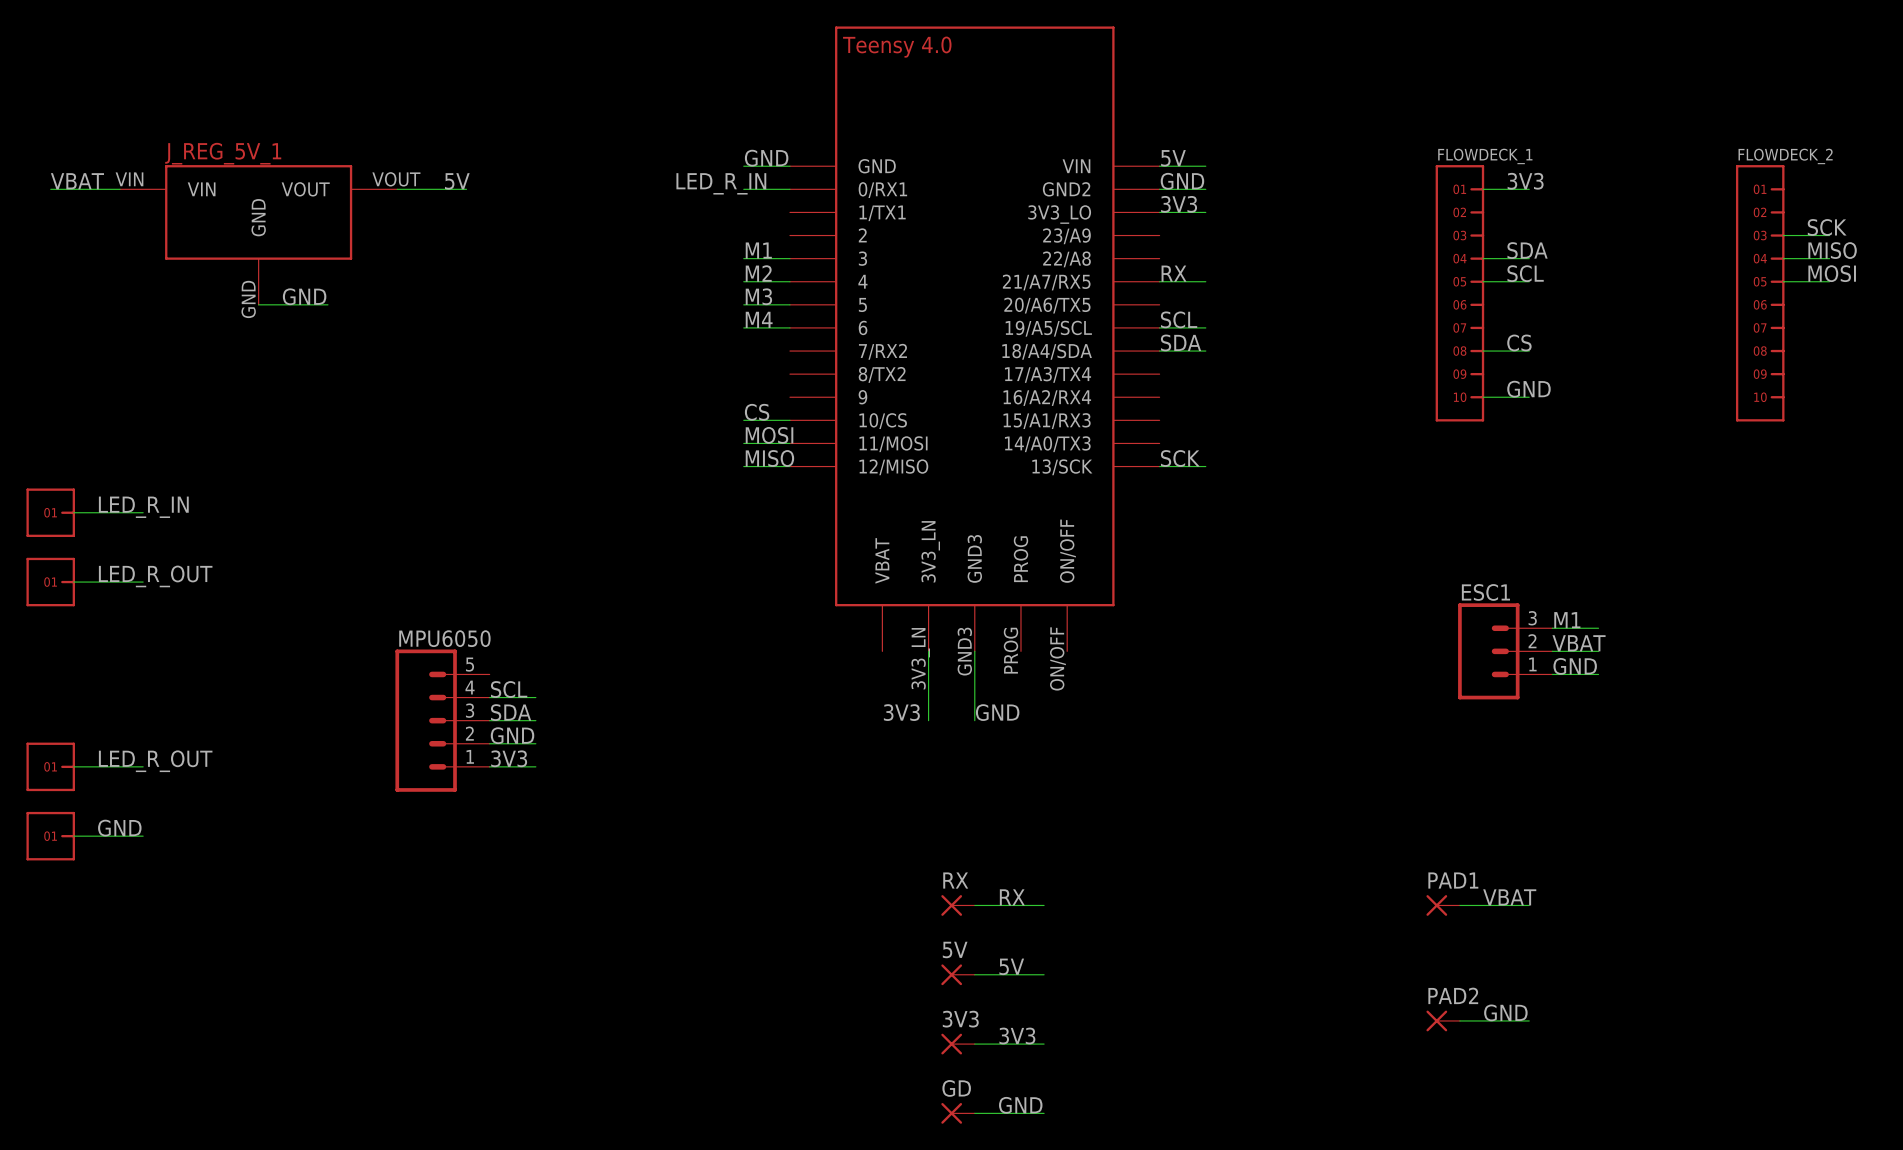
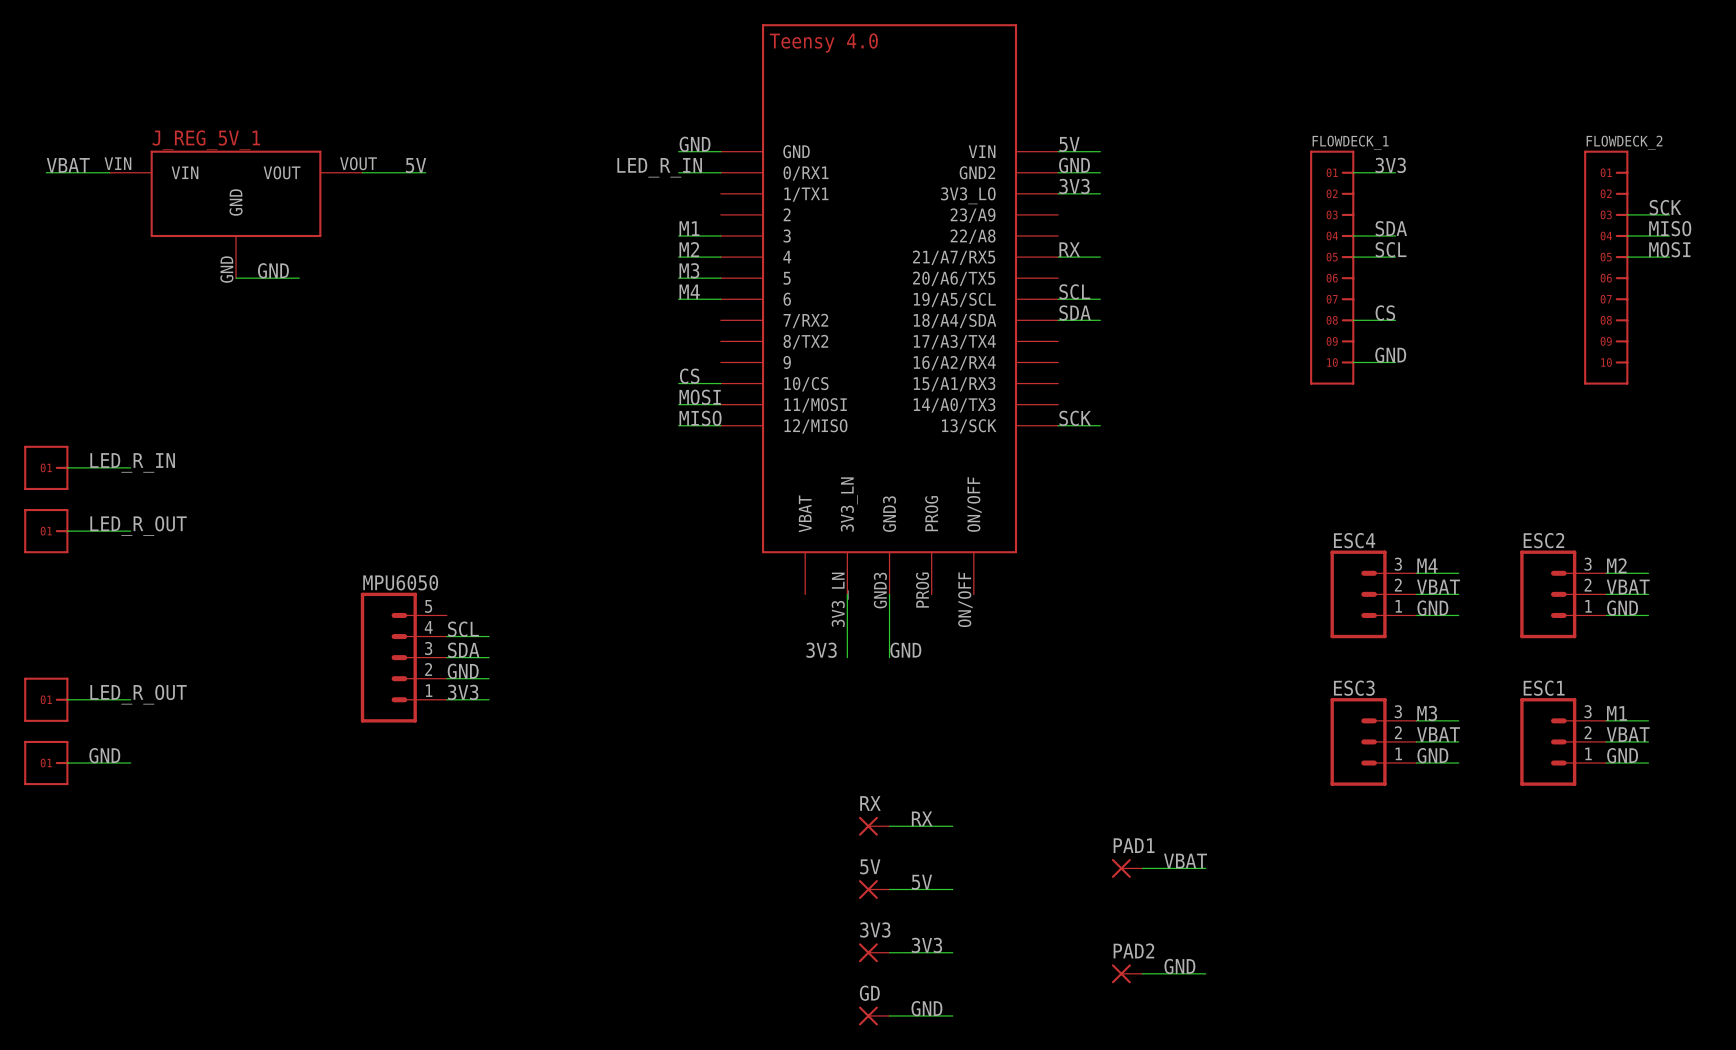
ESC1 name: ESC1 (1485, 592) -> ESC4 (1354, 540)
label: M1 (1567, 620) -> M4 (1427, 565)
label: none -> M2 (1616, 565)
wire: none -> (1606, 573) (1648, 573)
label: none -> VBAT (1628, 586)
ESC2: none -> (1563, 594)
wire: none -> (1606, 594) (1648, 594)
label: none -> GND (1622, 608)
wire: none -> (1606, 615) (1648, 615)
label: none -> M3 (1427, 713)
label: none -> M1 (1616, 713)
wire: none -> (1416, 720) (1458, 720)
wire: none -> (1606, 720) (1648, 720)
label: none -> VBAT (1438, 734)
label: none -> VBAT (1628, 734)
ESC3: none -> (1373, 741)
wire: none -> (1416, 741) (1458, 741)
ESC1: none -> (1563, 741)
wire: none -> (1606, 741) (1648, 741)
label: none -> GND (1432, 755)
label: none -> GND (1622, 755)
wire: none -> (1416, 763) (1458, 763)
wire: none -> (1606, 763) (1648, 763)
label: VBAT (1509, 897) -> none
PAD1 position: (1443, 905) -> (1127, 868)
wire: (1459, 905) (1529, 905) -> (1142, 868) (1205, 868)
label: none -> VBAT (1185, 861)
label: GND (1505, 1012) -> none
PAD2 position: (1443, 1020) -> (1127, 973)
wire: (1459, 1020) (1529, 1020) -> (1142, 973) (1205, 973)
label: none -> GND (1179, 966)

